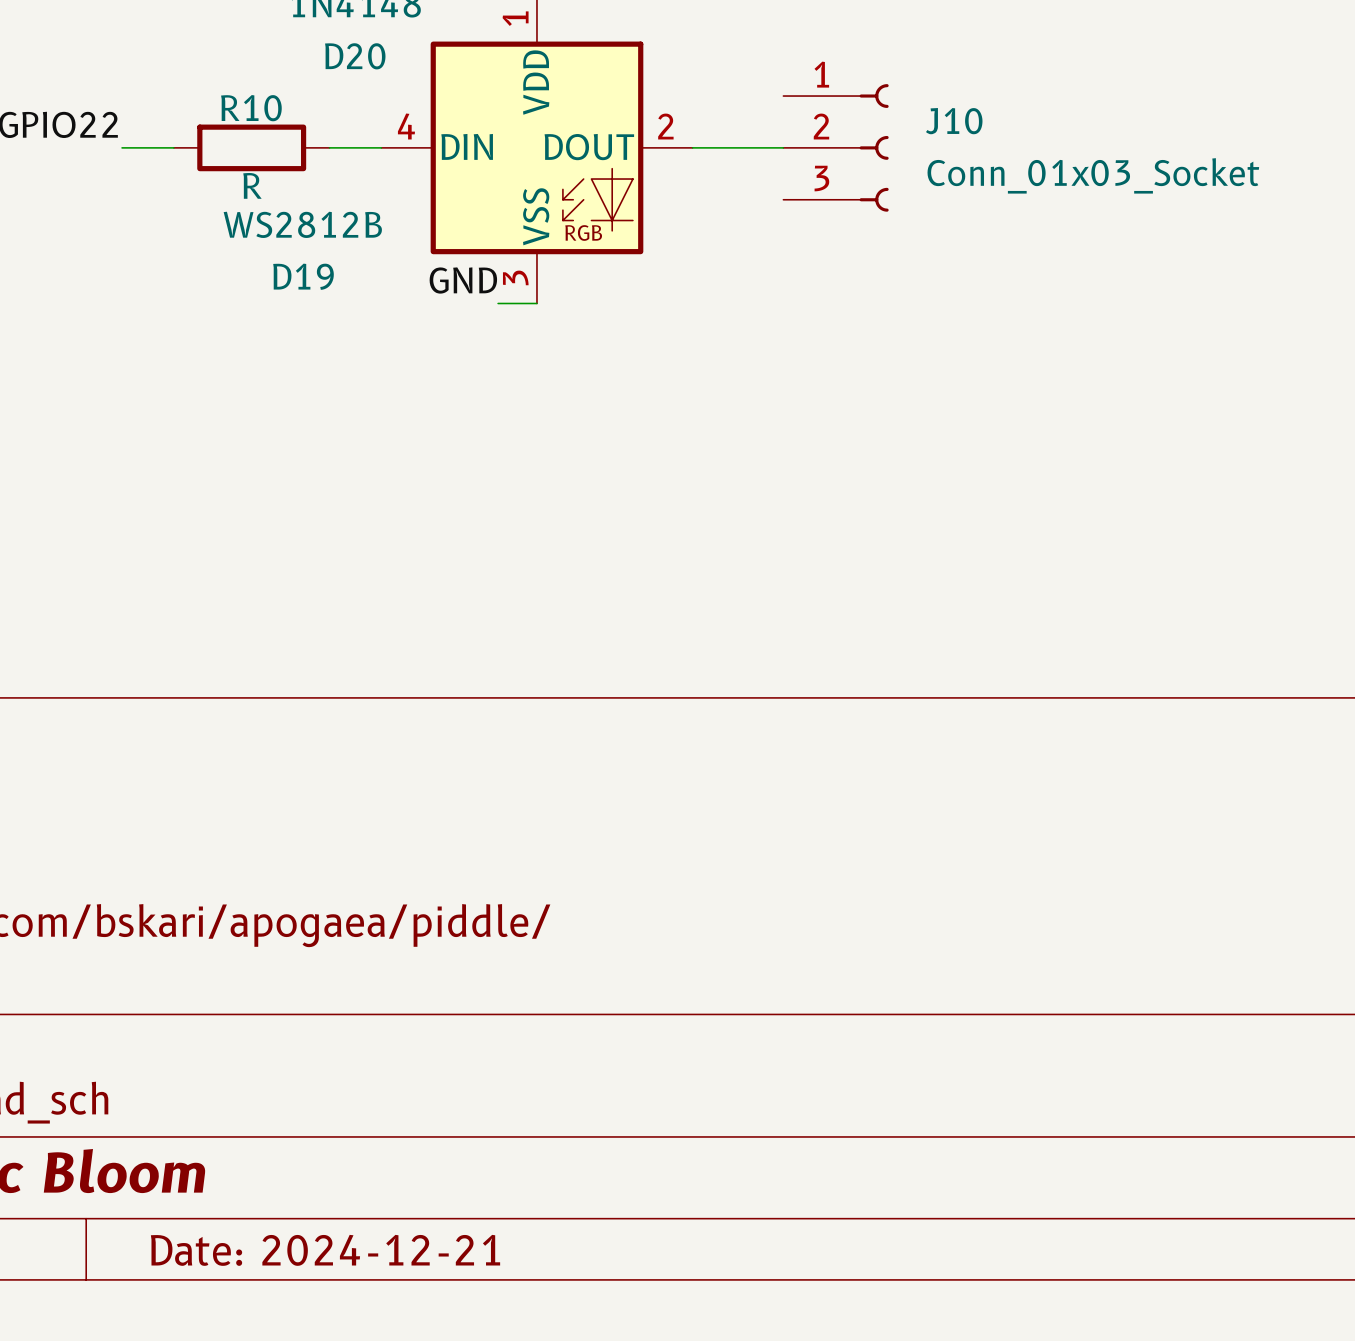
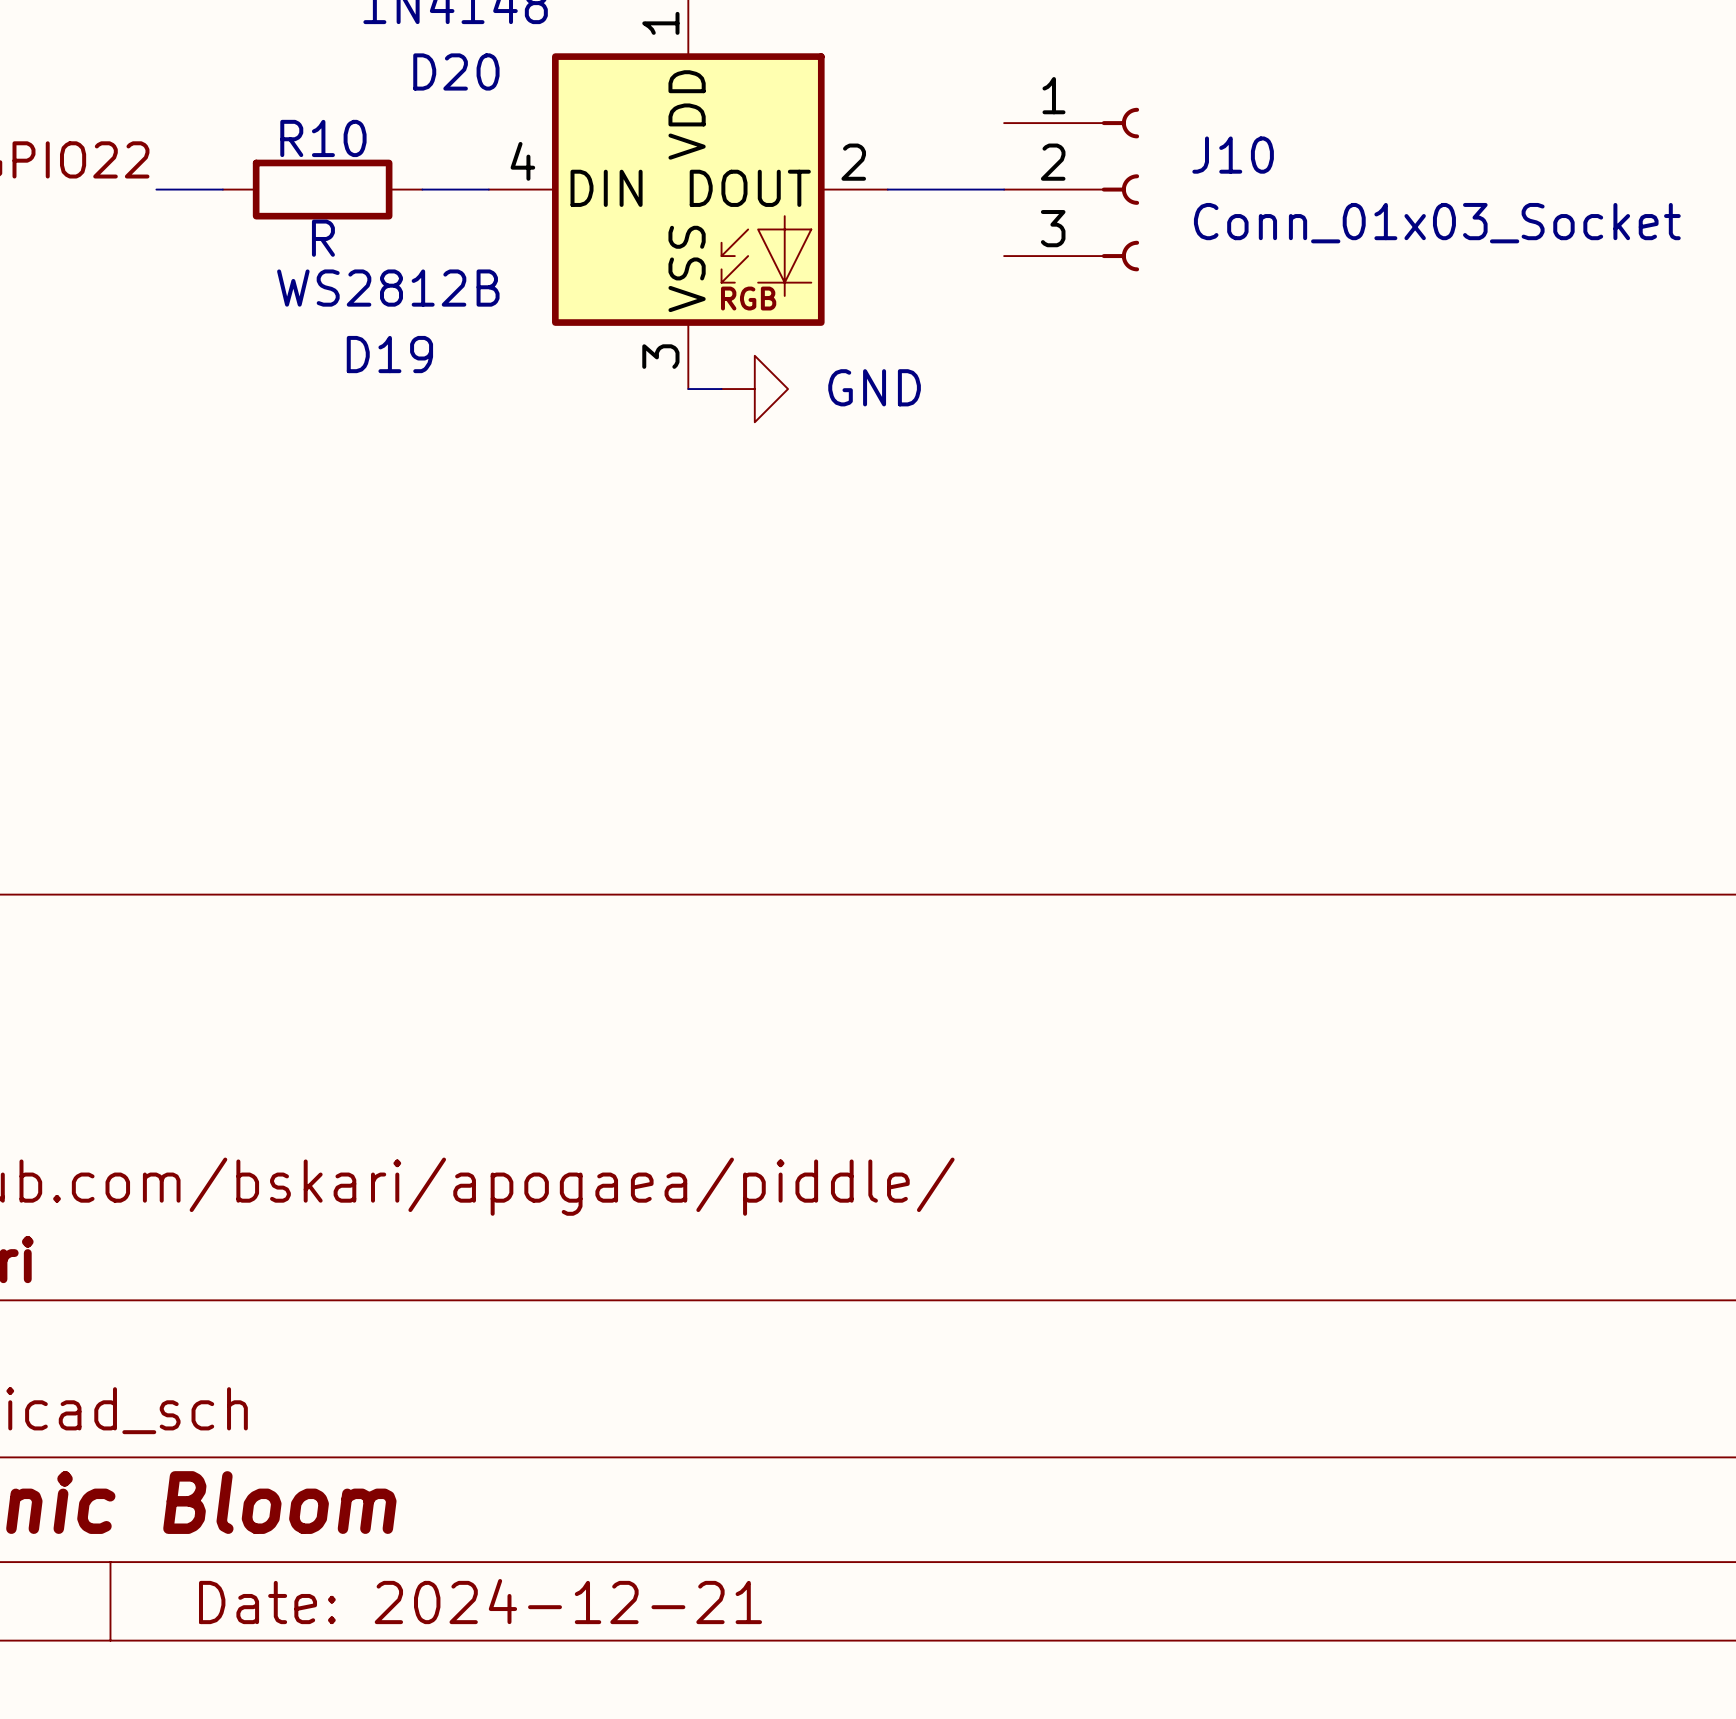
label: GND (463, 280) -> none
wire: (498, 303) (536, 303) -> (721, 389) (688, 389)
power symbol: none -> GND (754, 389)

